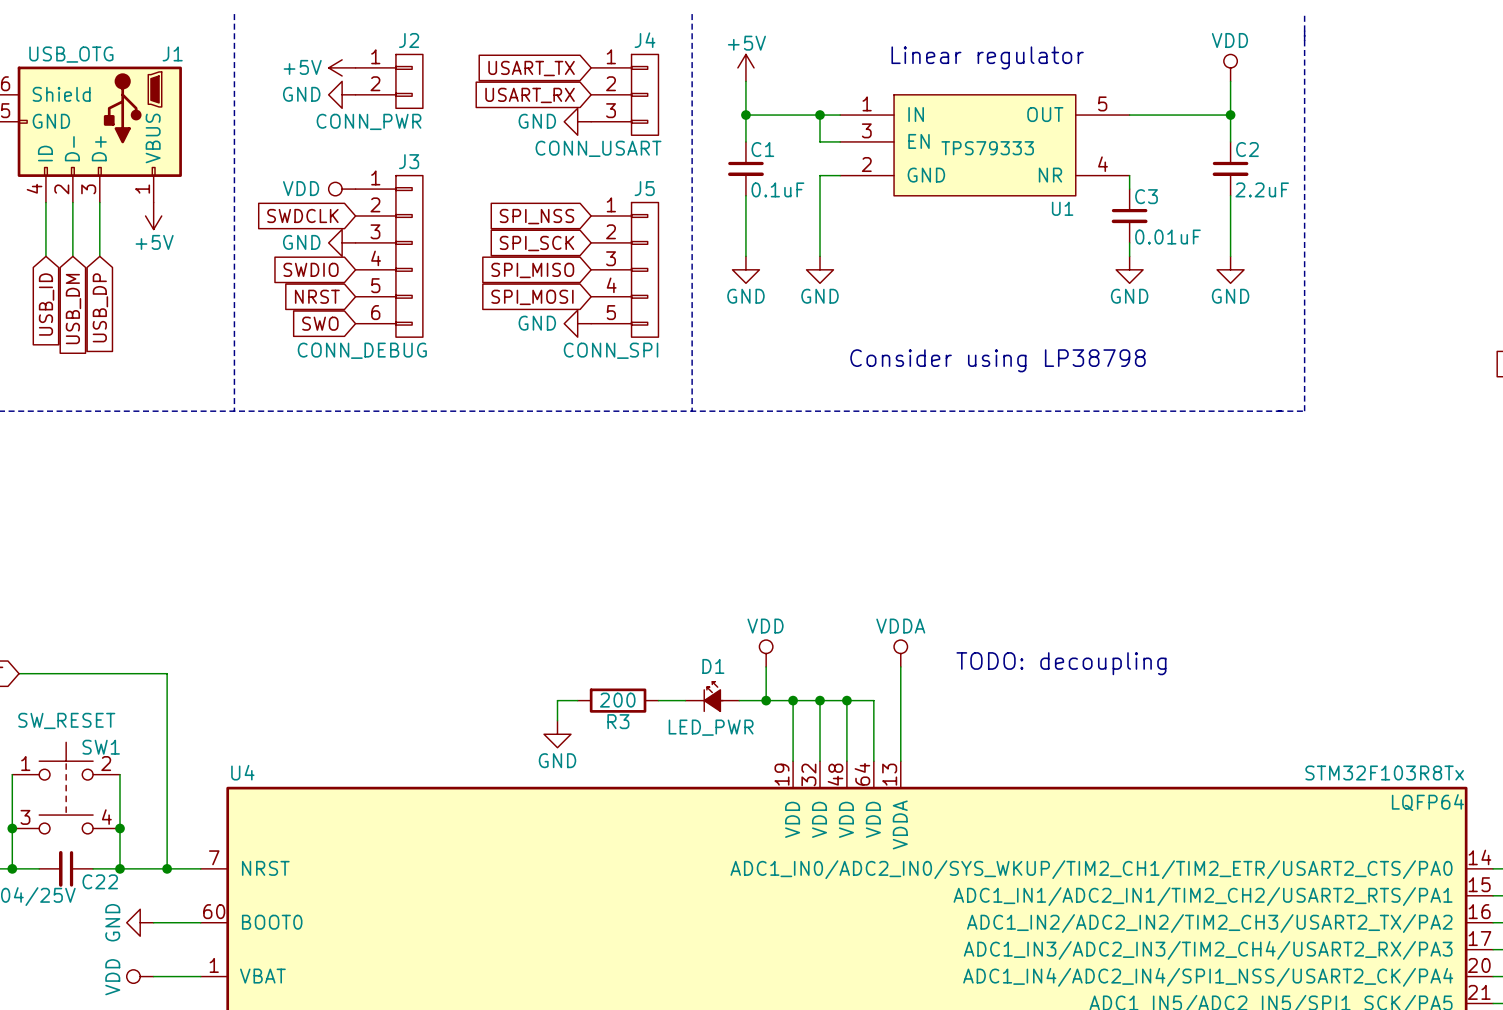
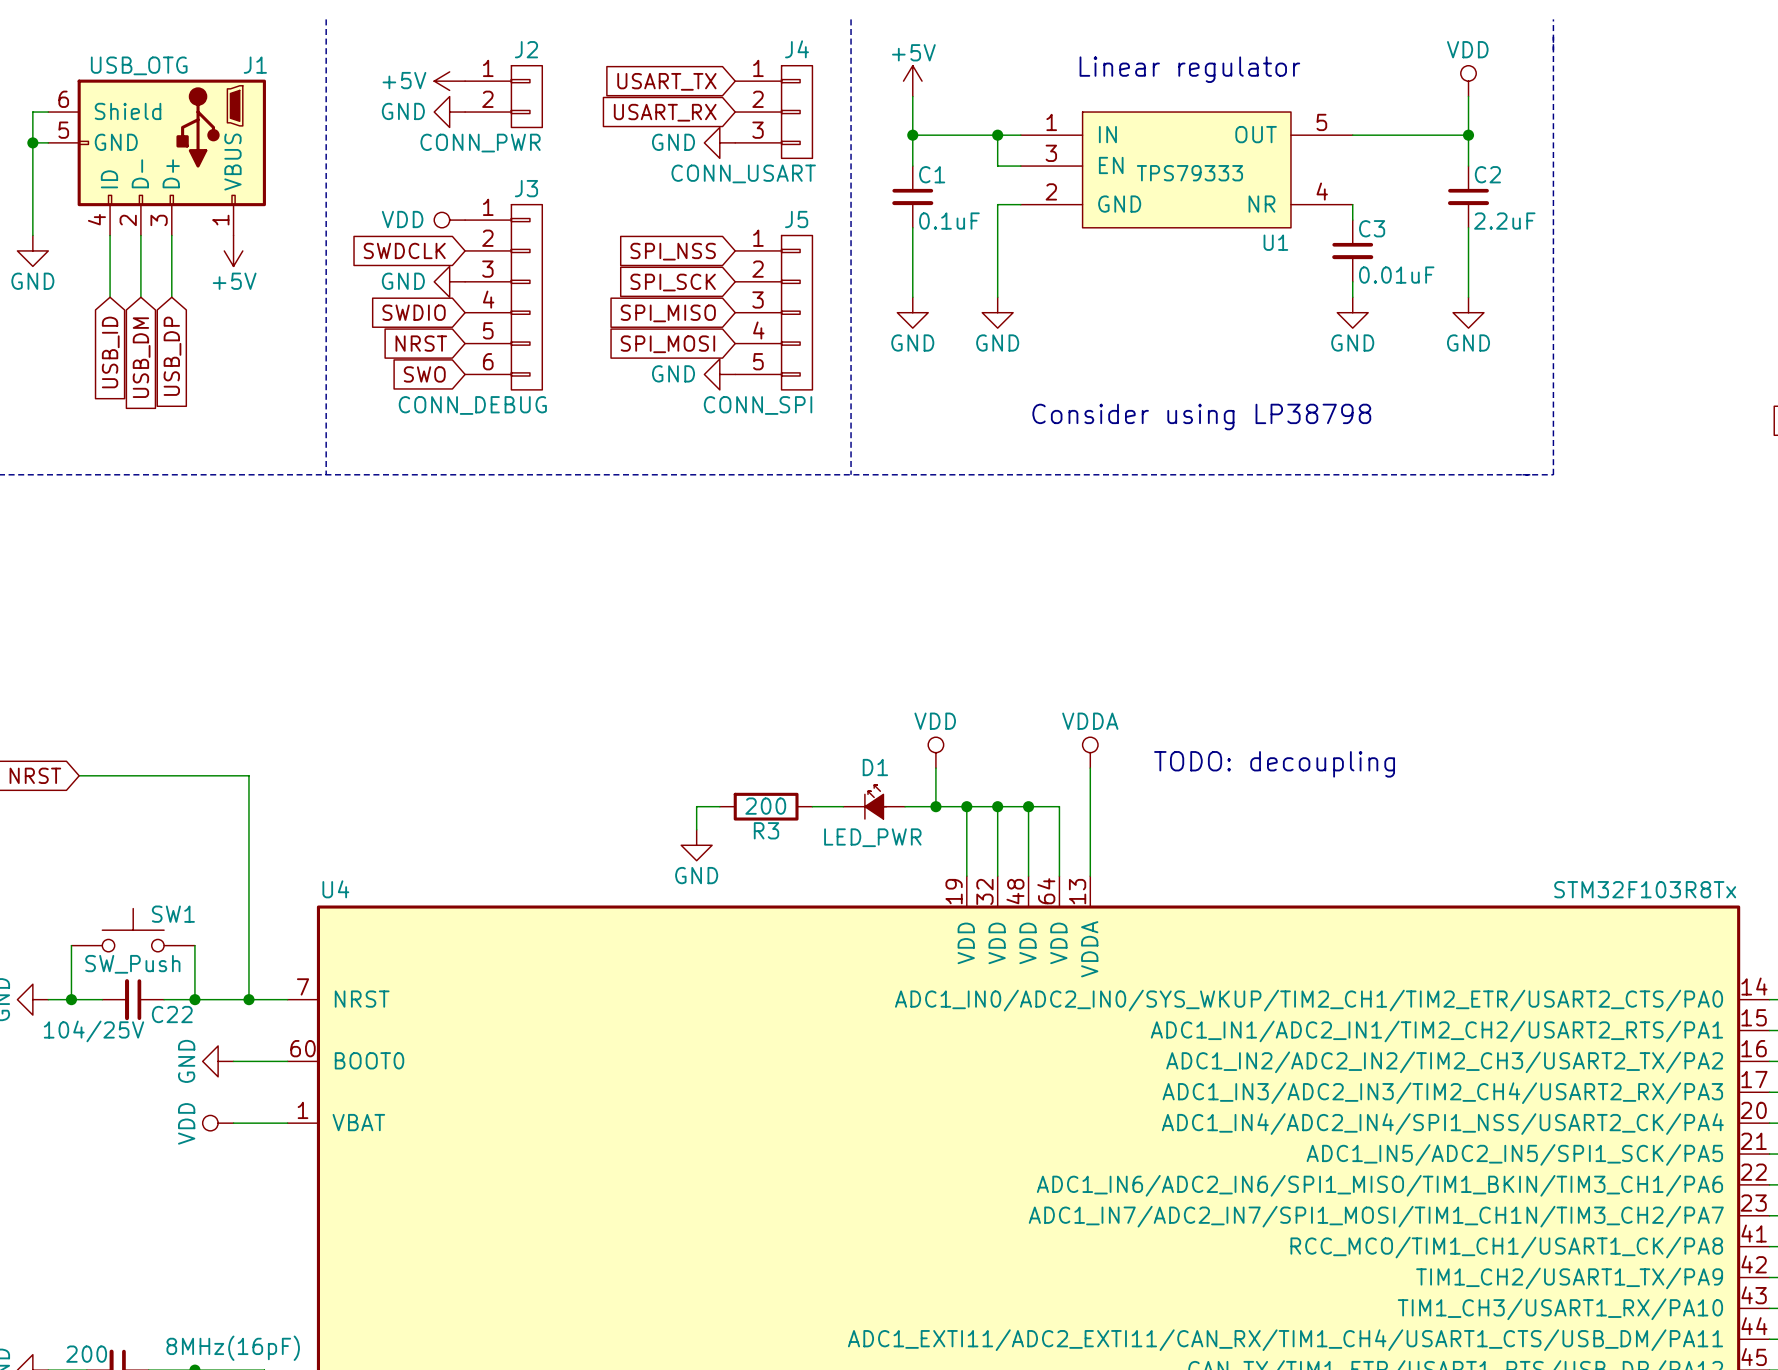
SW1 value: SW_RESET (66, 720) -> SW_Push (132, 964)
SW1 symbol: [12, 742, 121, 834] -> [71, 908, 195, 952]
SW1 name position: SW1 (101, 747) -> SW1 (173, 914)
wire: (12, 774) (12, 821) -> none
wire: (120, 774) (120, 821) -> none
U4 text: LQFP64 (1427, 802) -> none
junction: (12, 828) -> none
junction: (120, 828) -> none

